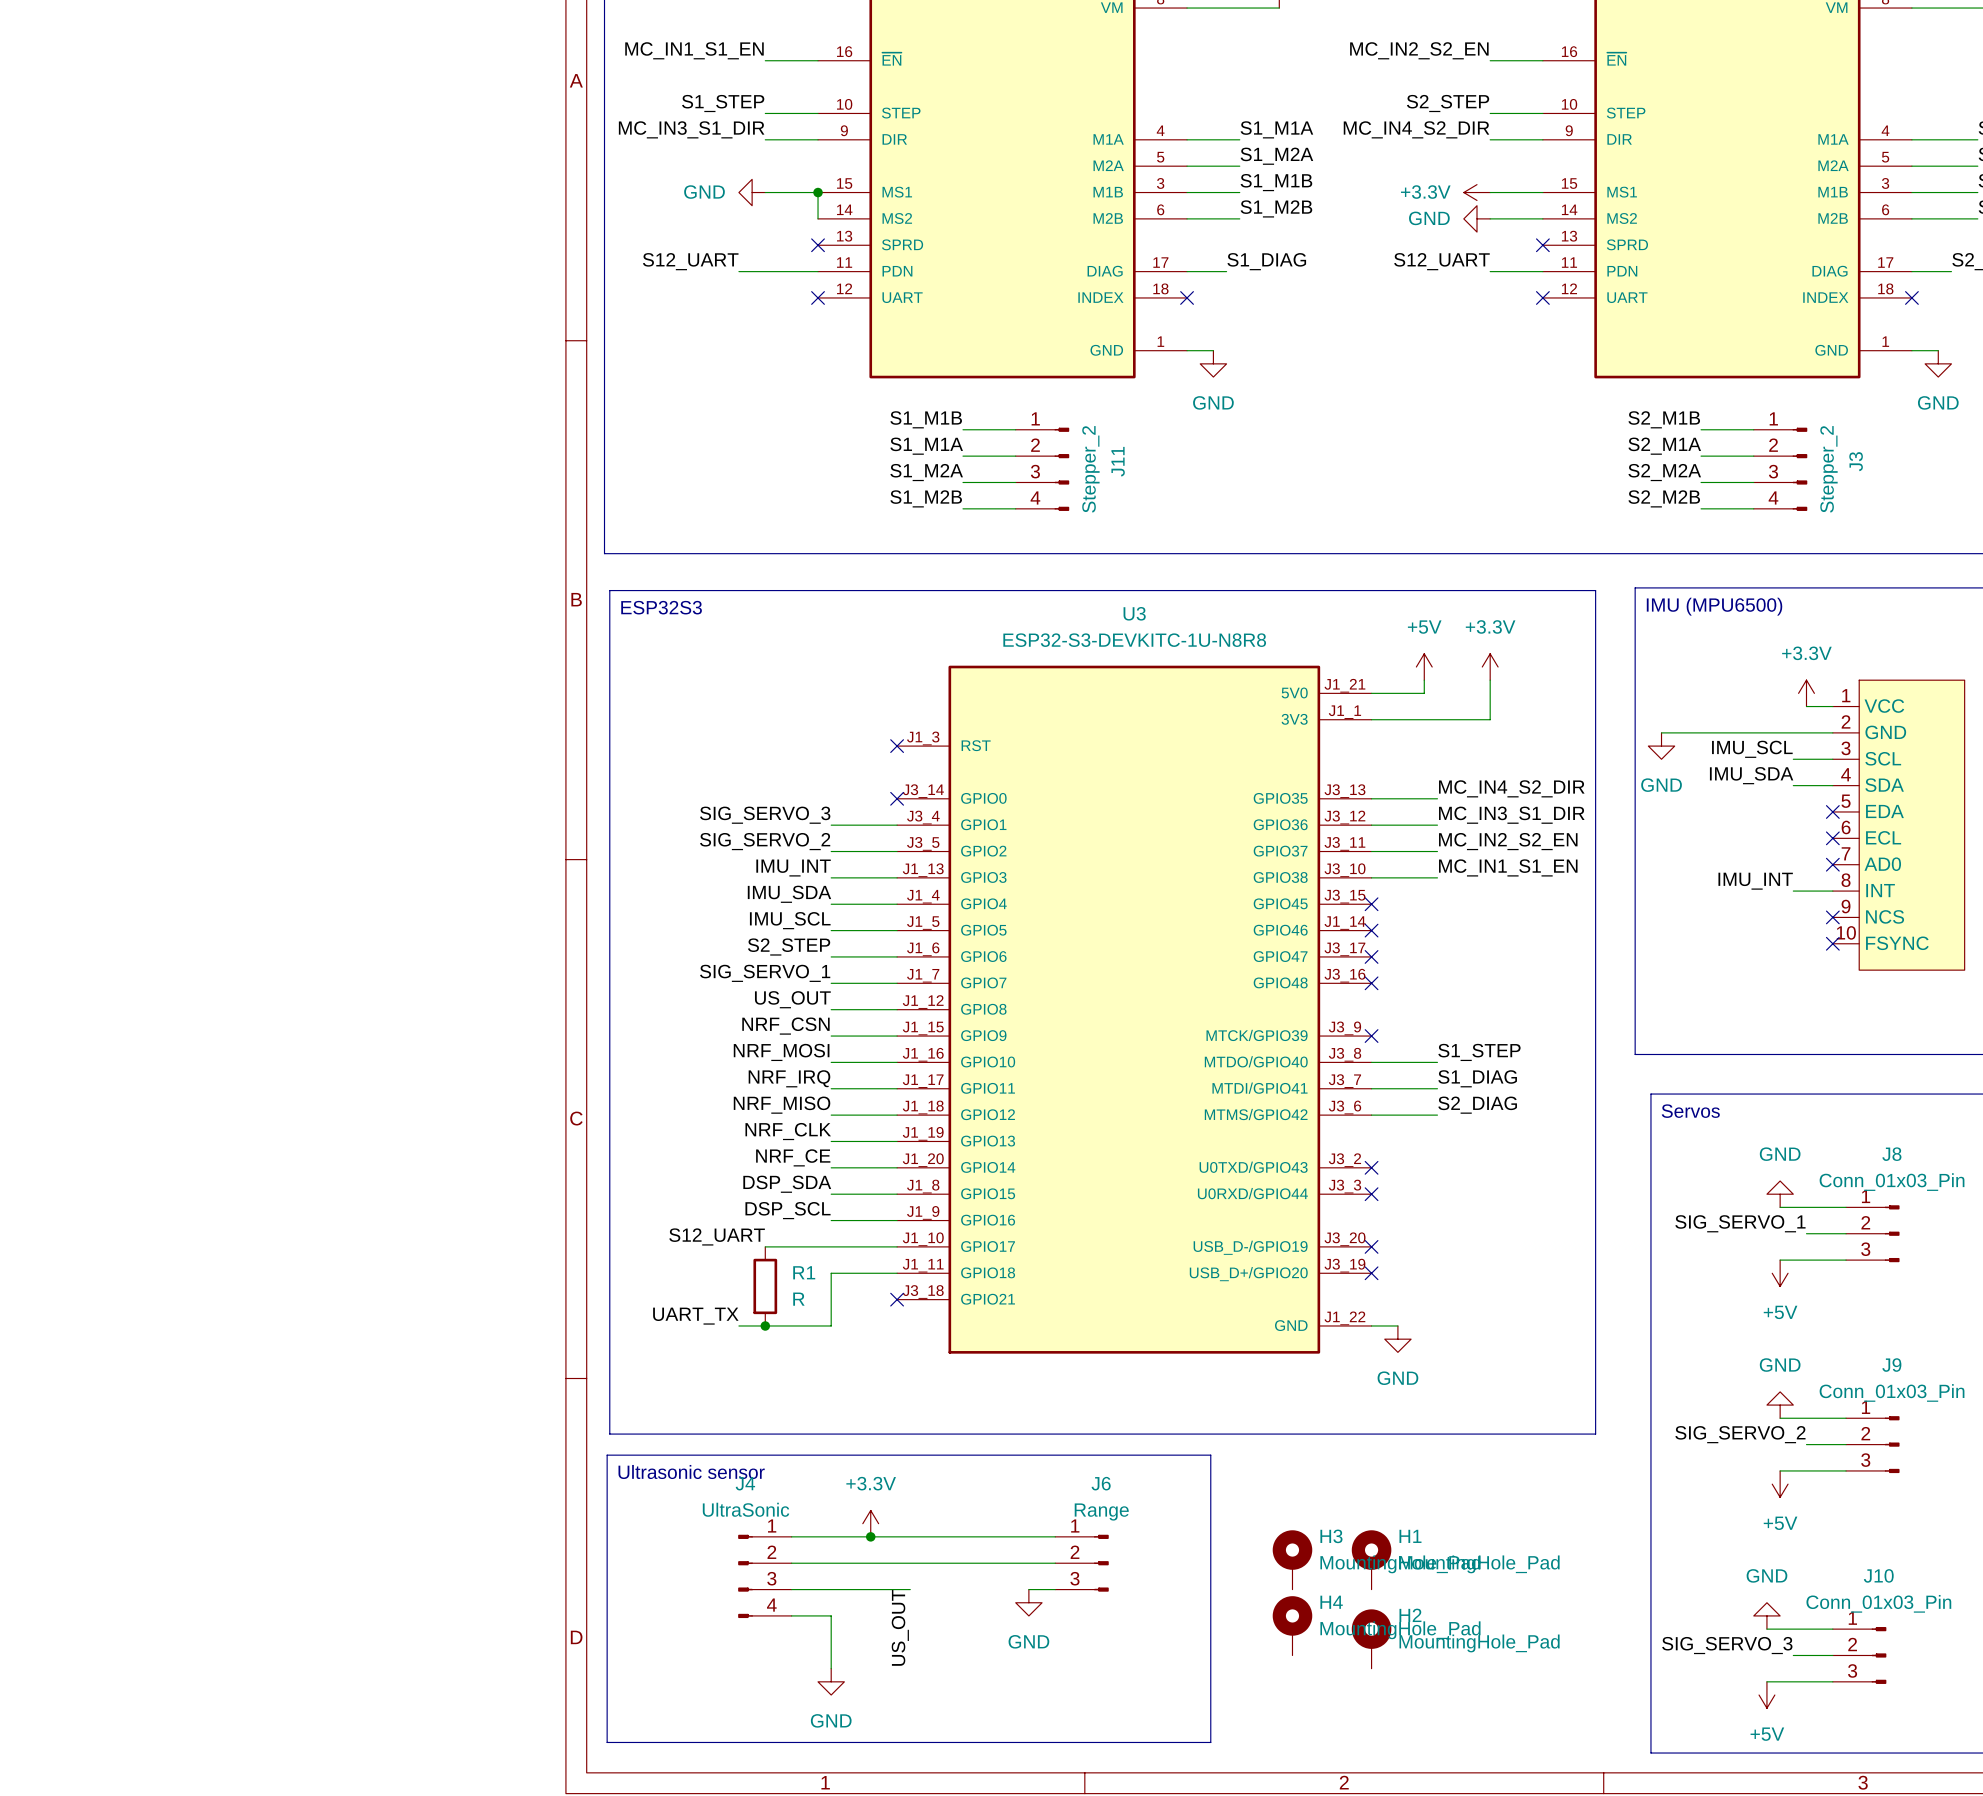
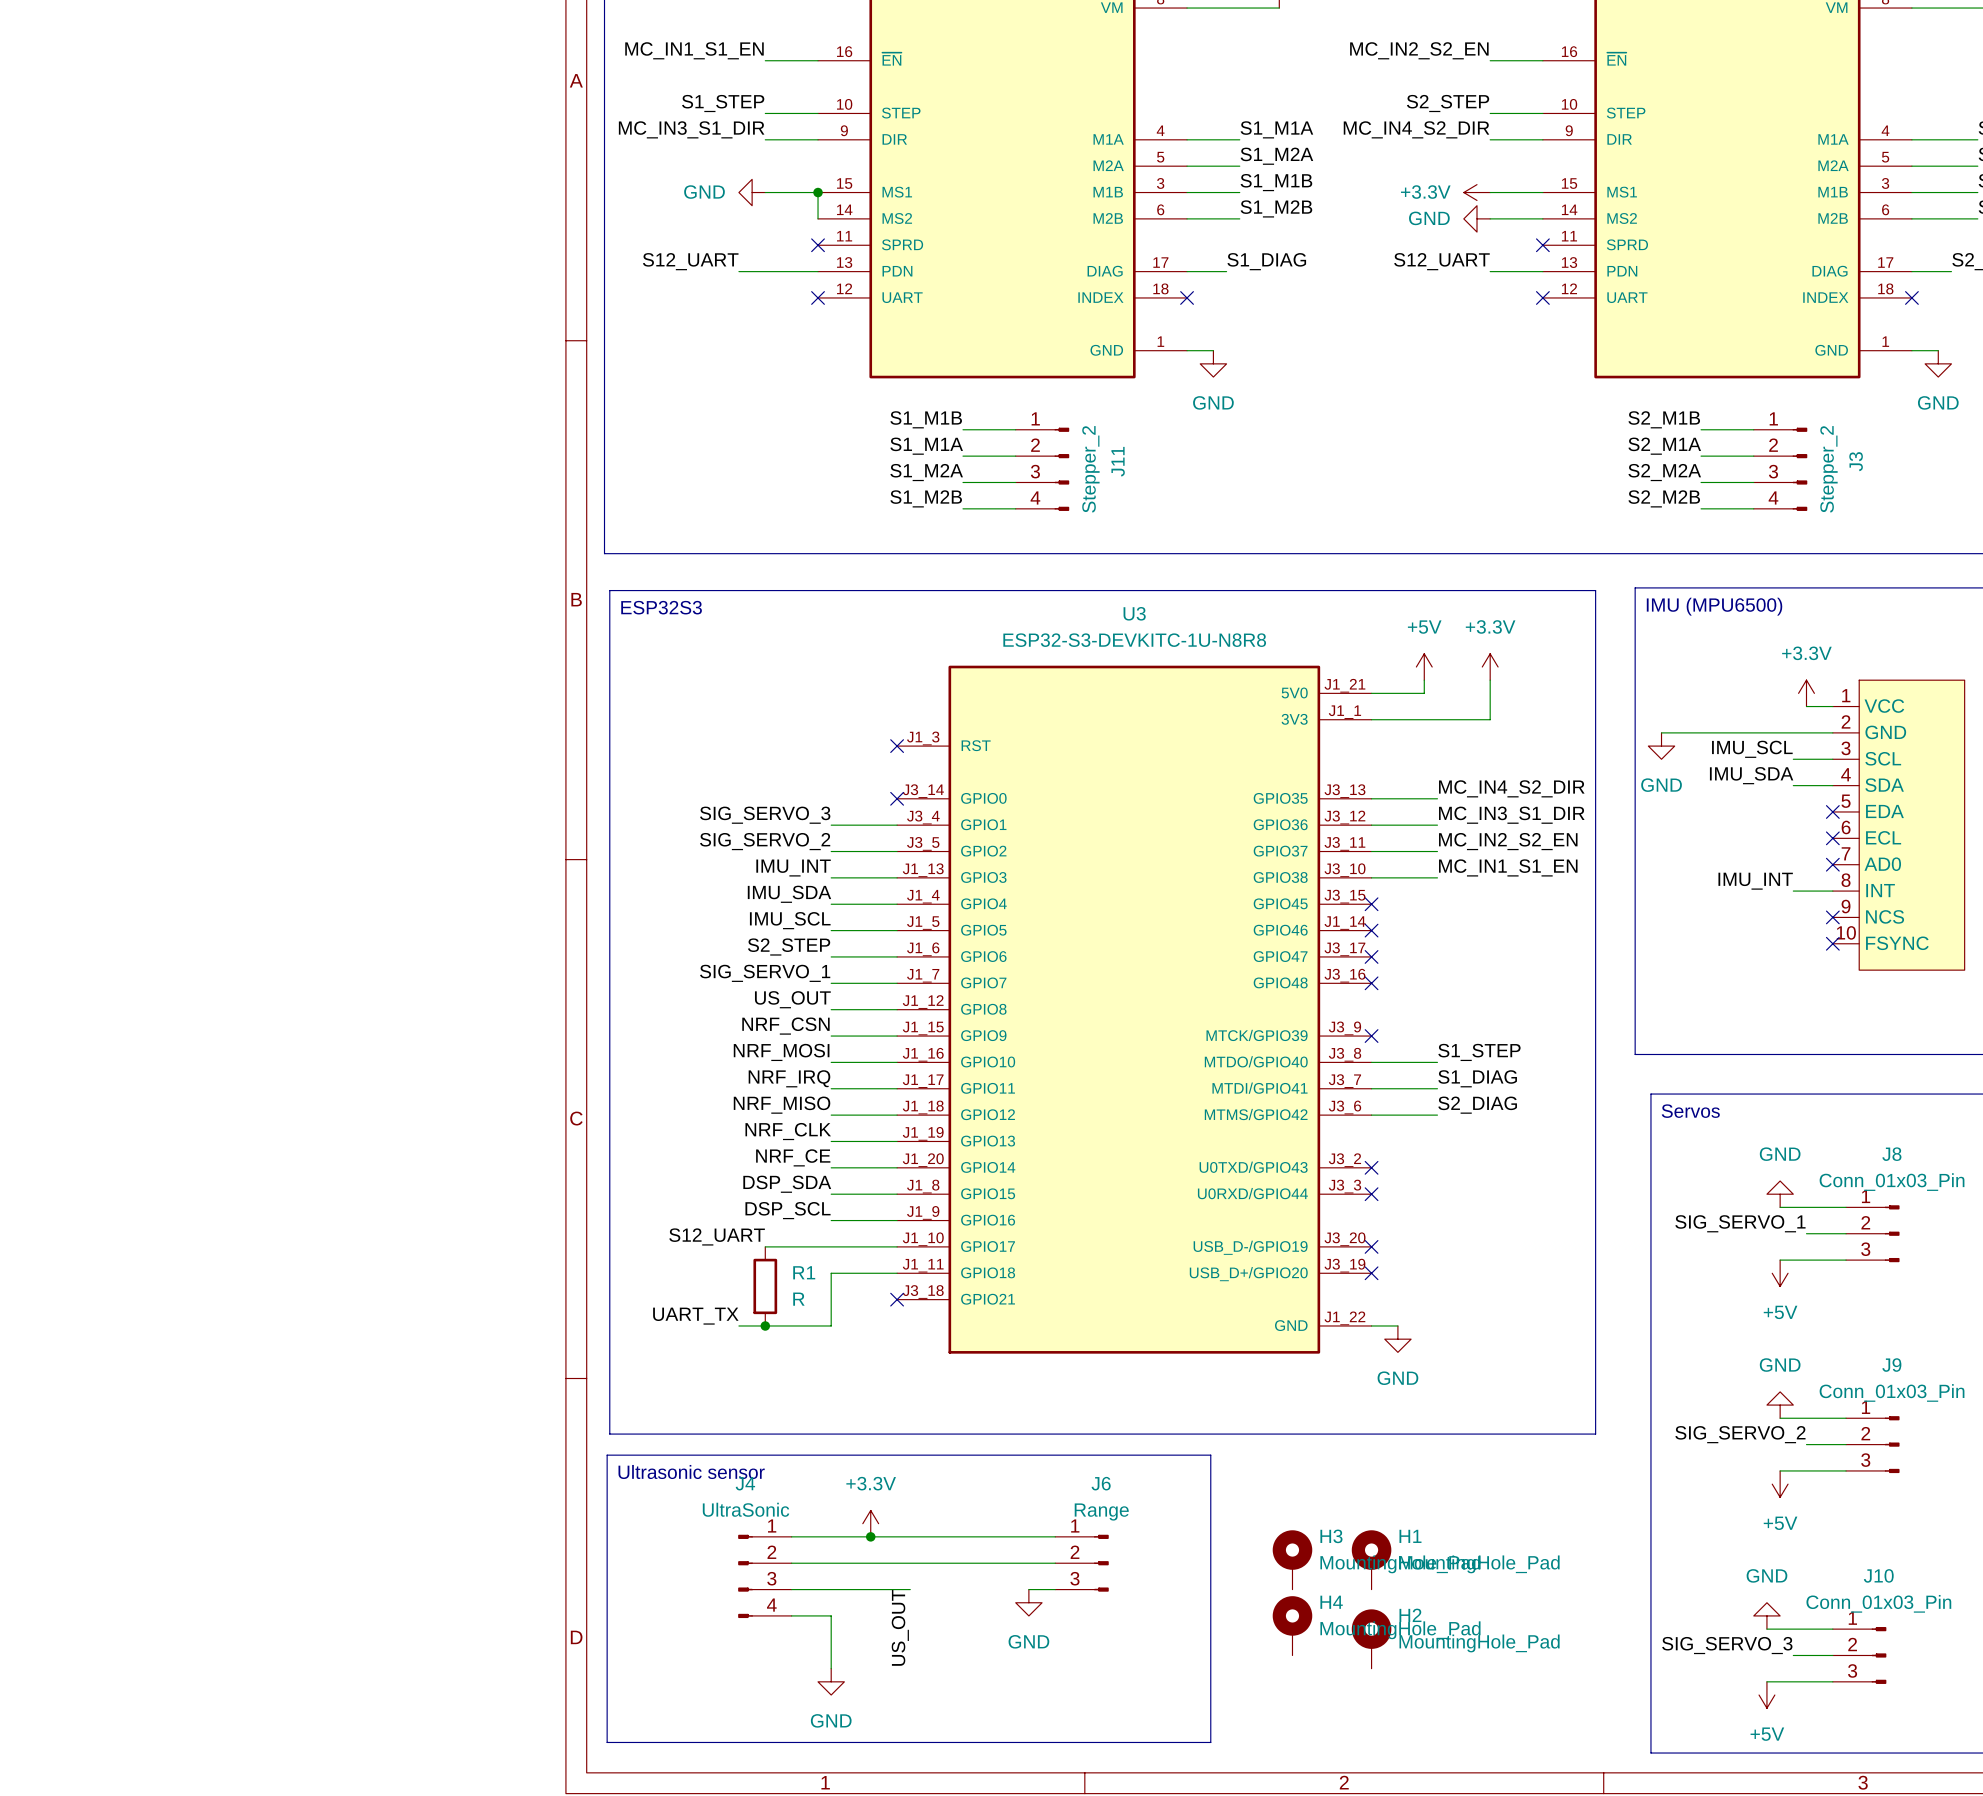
part pin number: 13 (844, 236) -> 11 (844, 236)
part pin number: 13 (1569, 236) -> 11 (1569, 236)
part pin number: 11 (844, 262) -> 13 (844, 262)
part pin number: 11 (1569, 262) -> 13 (1569, 262)

